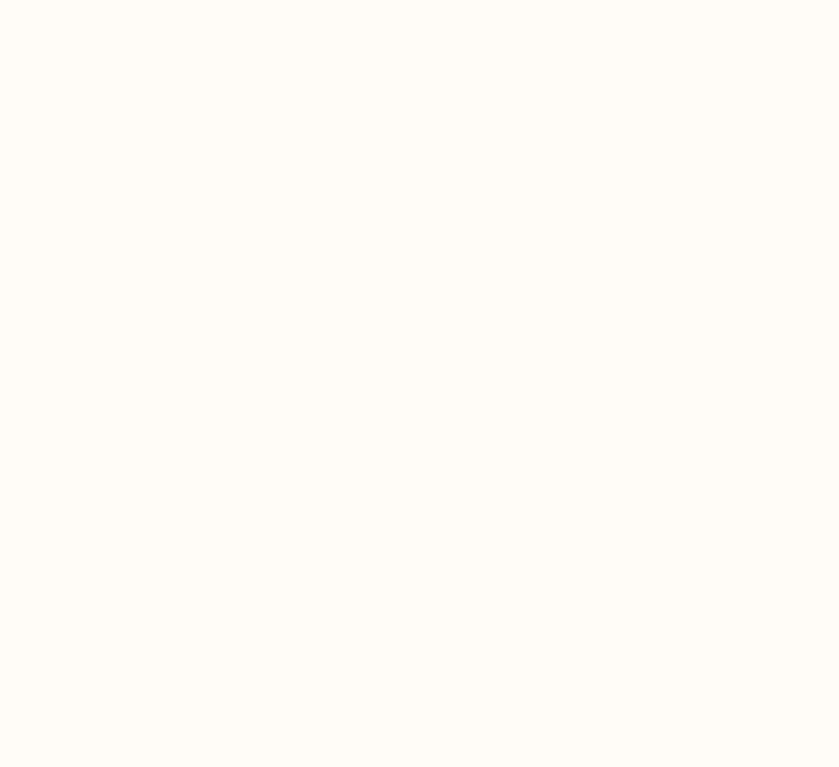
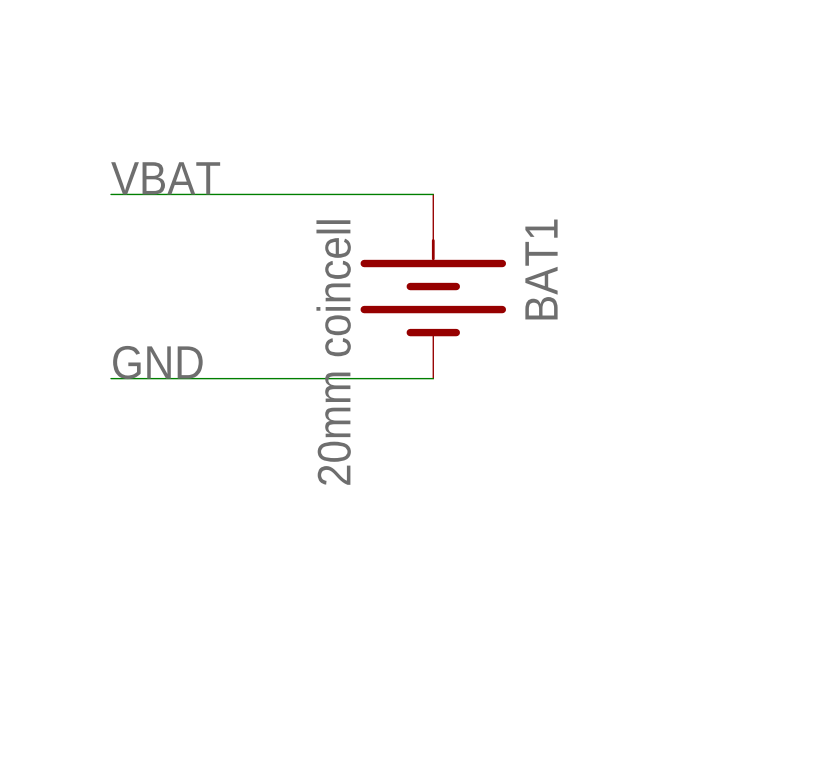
label: none -> VBAT (165, 178)
wire: none -> (110, 194) (433, 194)
BAT1: none -> 20mm coincell (433, 286)
label: none -> GND (157, 362)
wire: none -> (110, 378) (433, 378)

